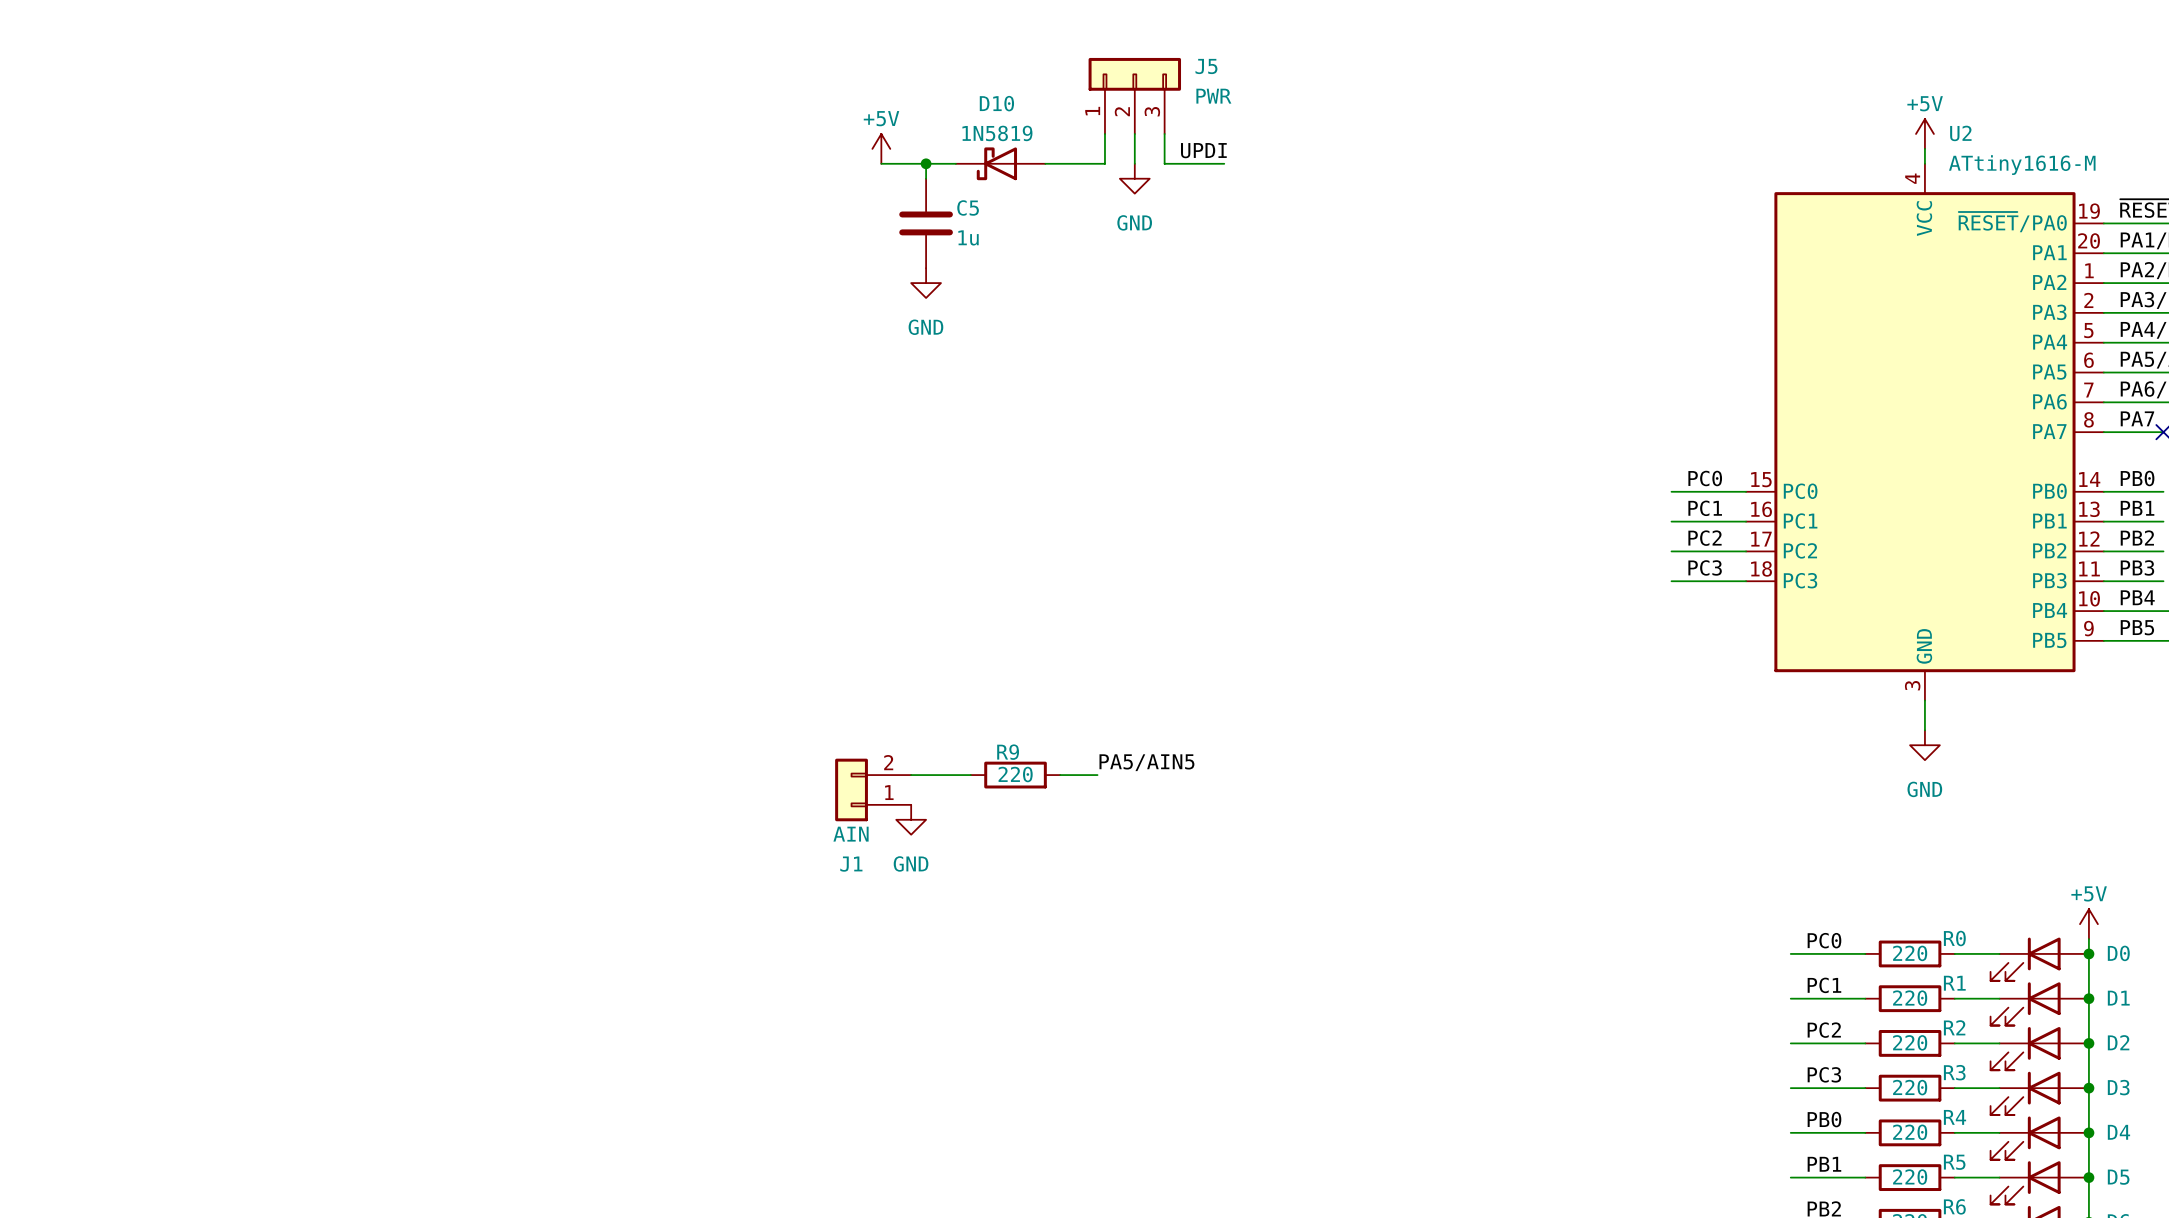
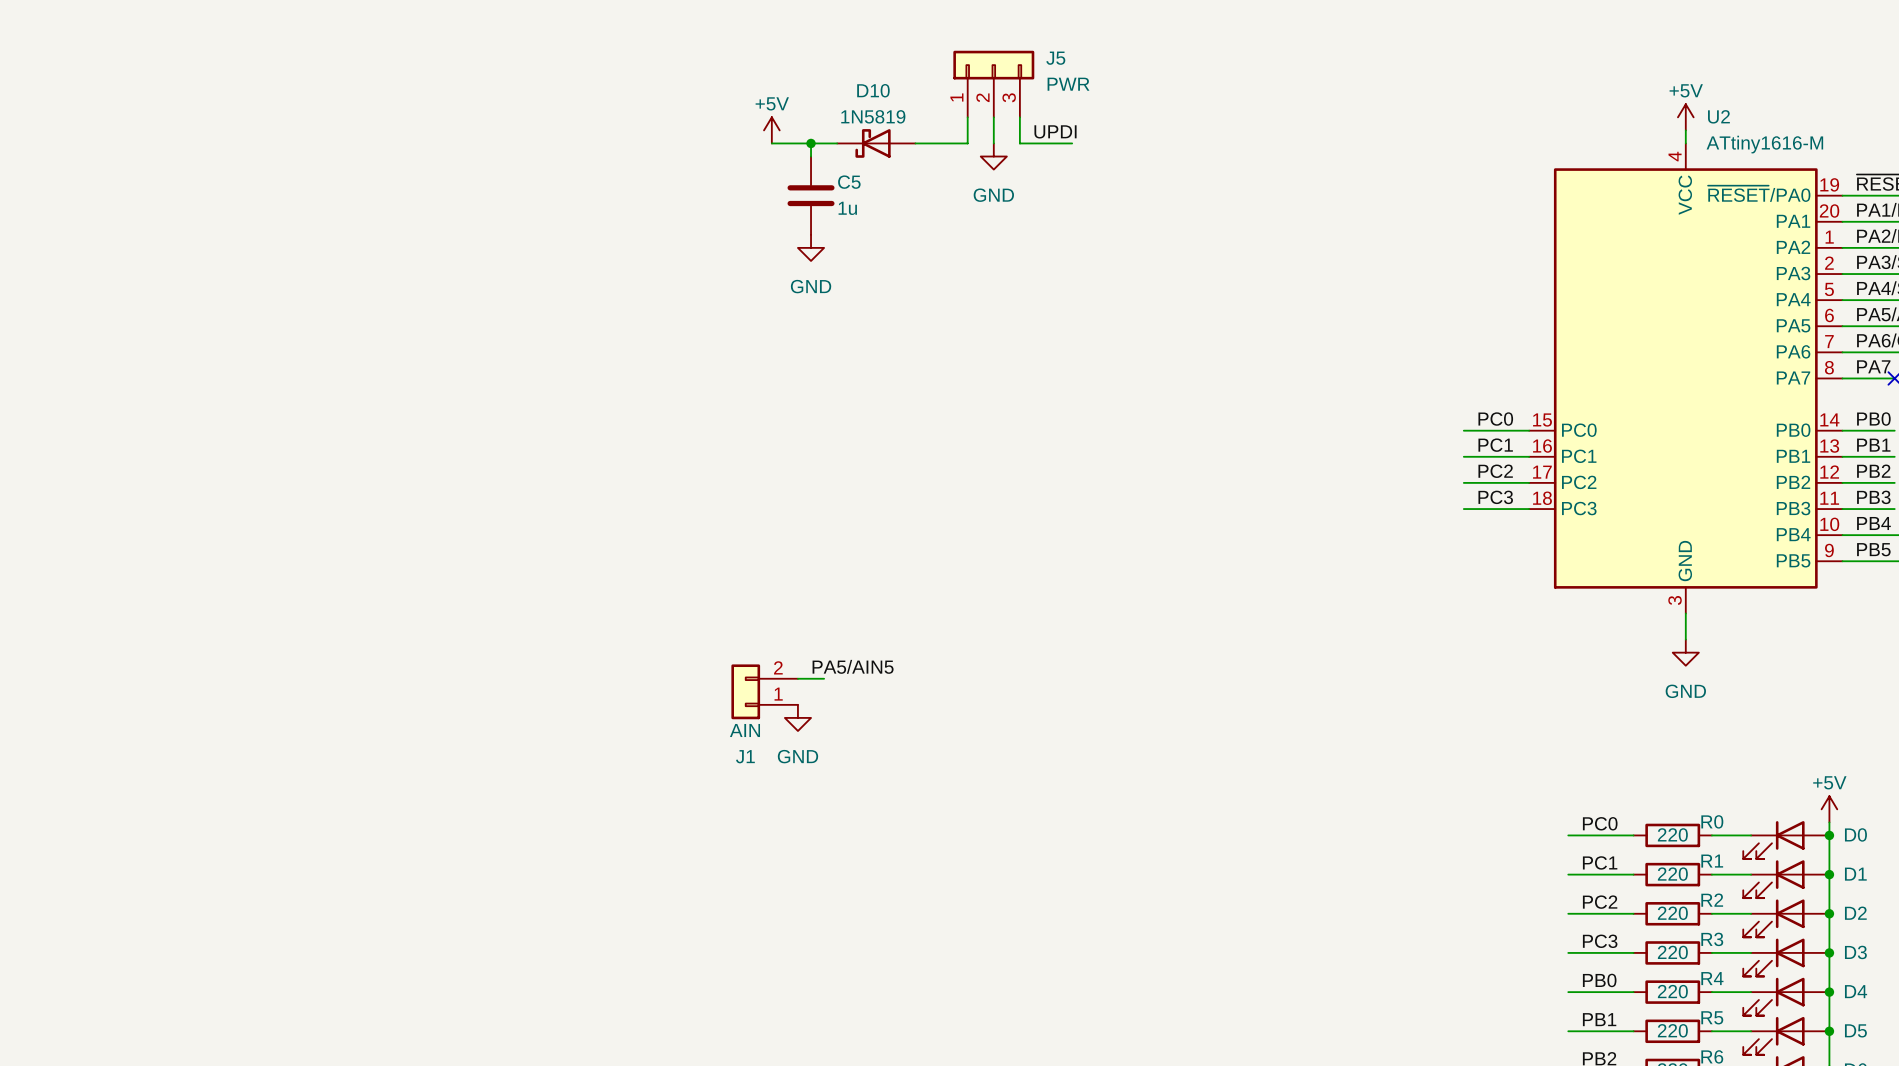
label position: PA5/AIN5 (1146, 762) -> PA5/AIN5 (853, 666)
wire: (940, 775) (970, 775) -> none
R9: 220 (1015, 775) -> none
wire: (1060, 775) (1097, 775) -> none

